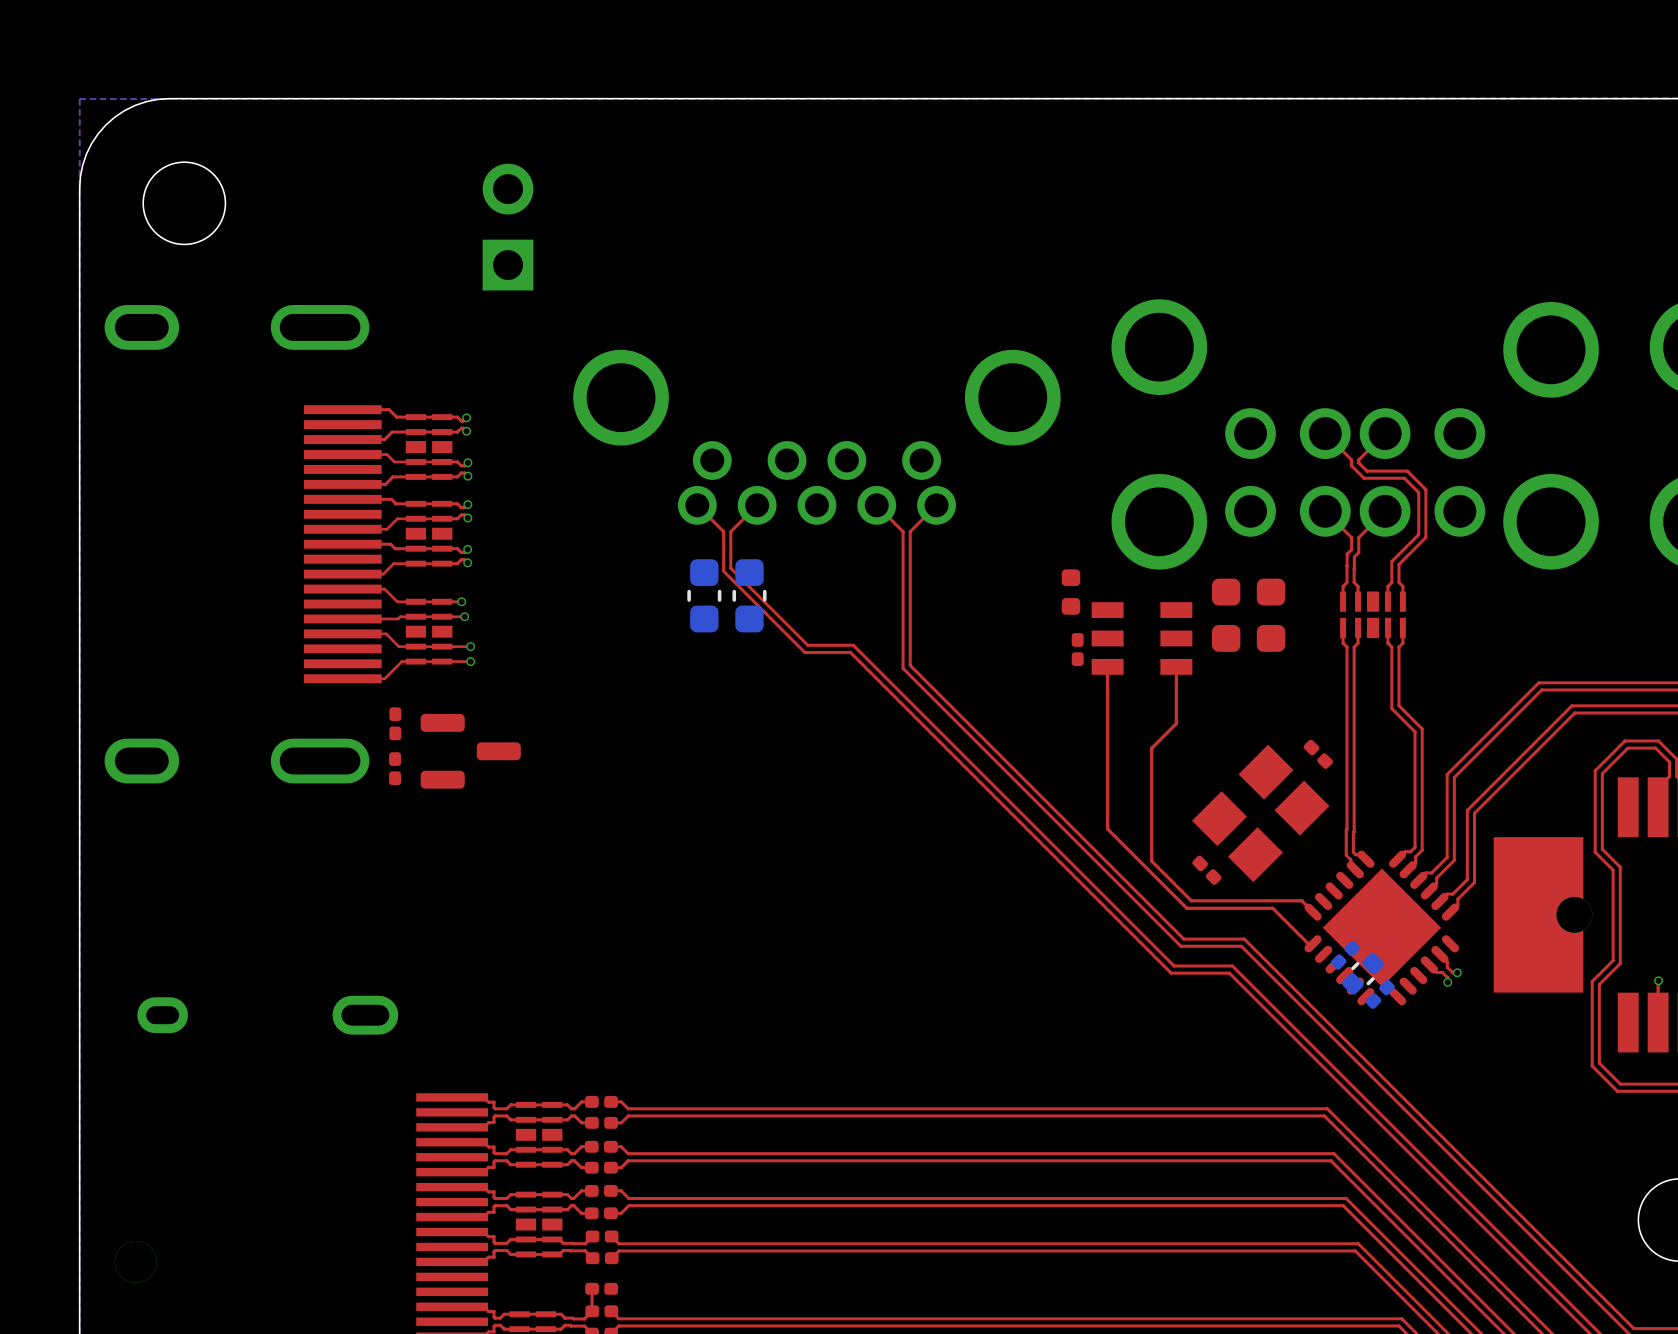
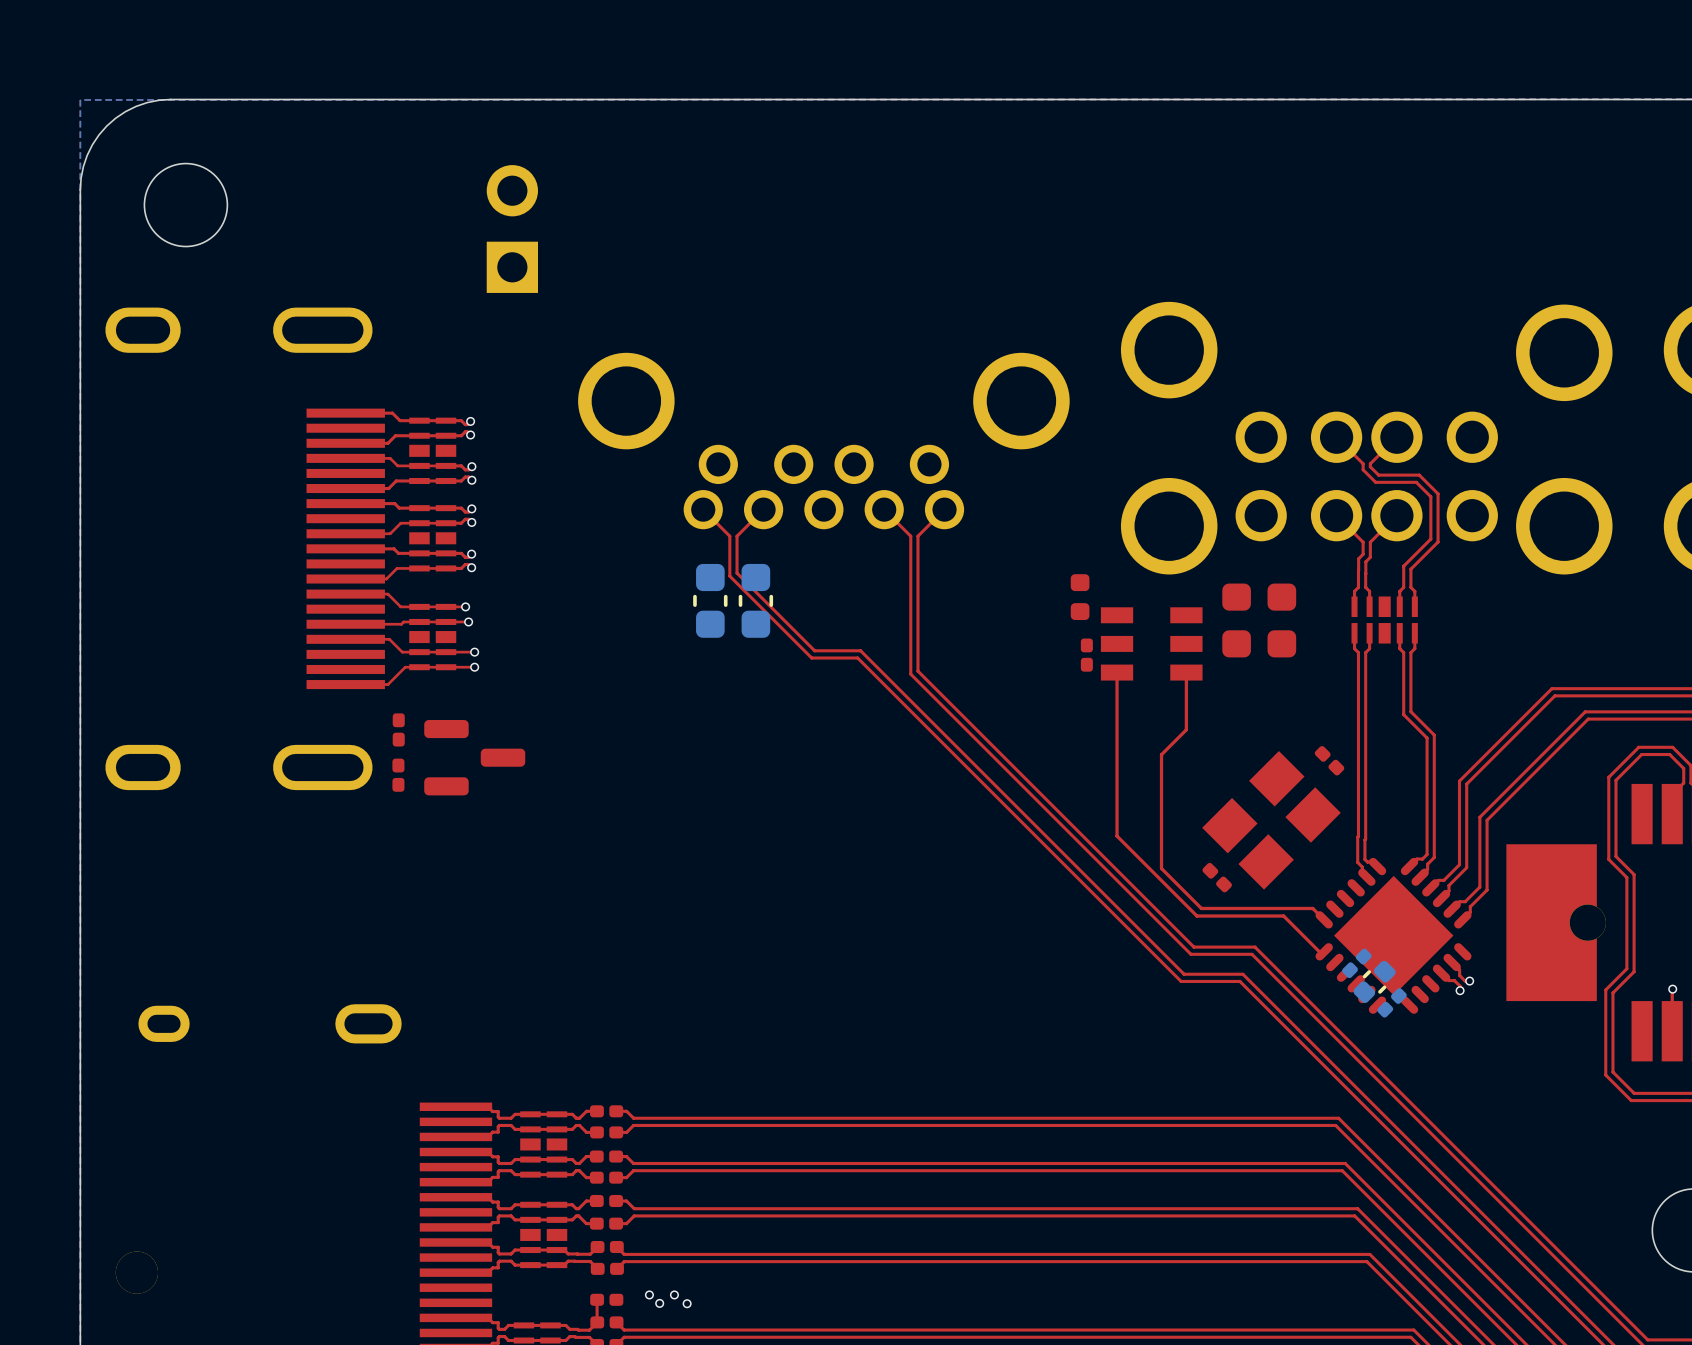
via: none -> (649, 1294)
via: none -> (674, 1294)
via: none -> (659, 1303)
via: none -> (687, 1303)

